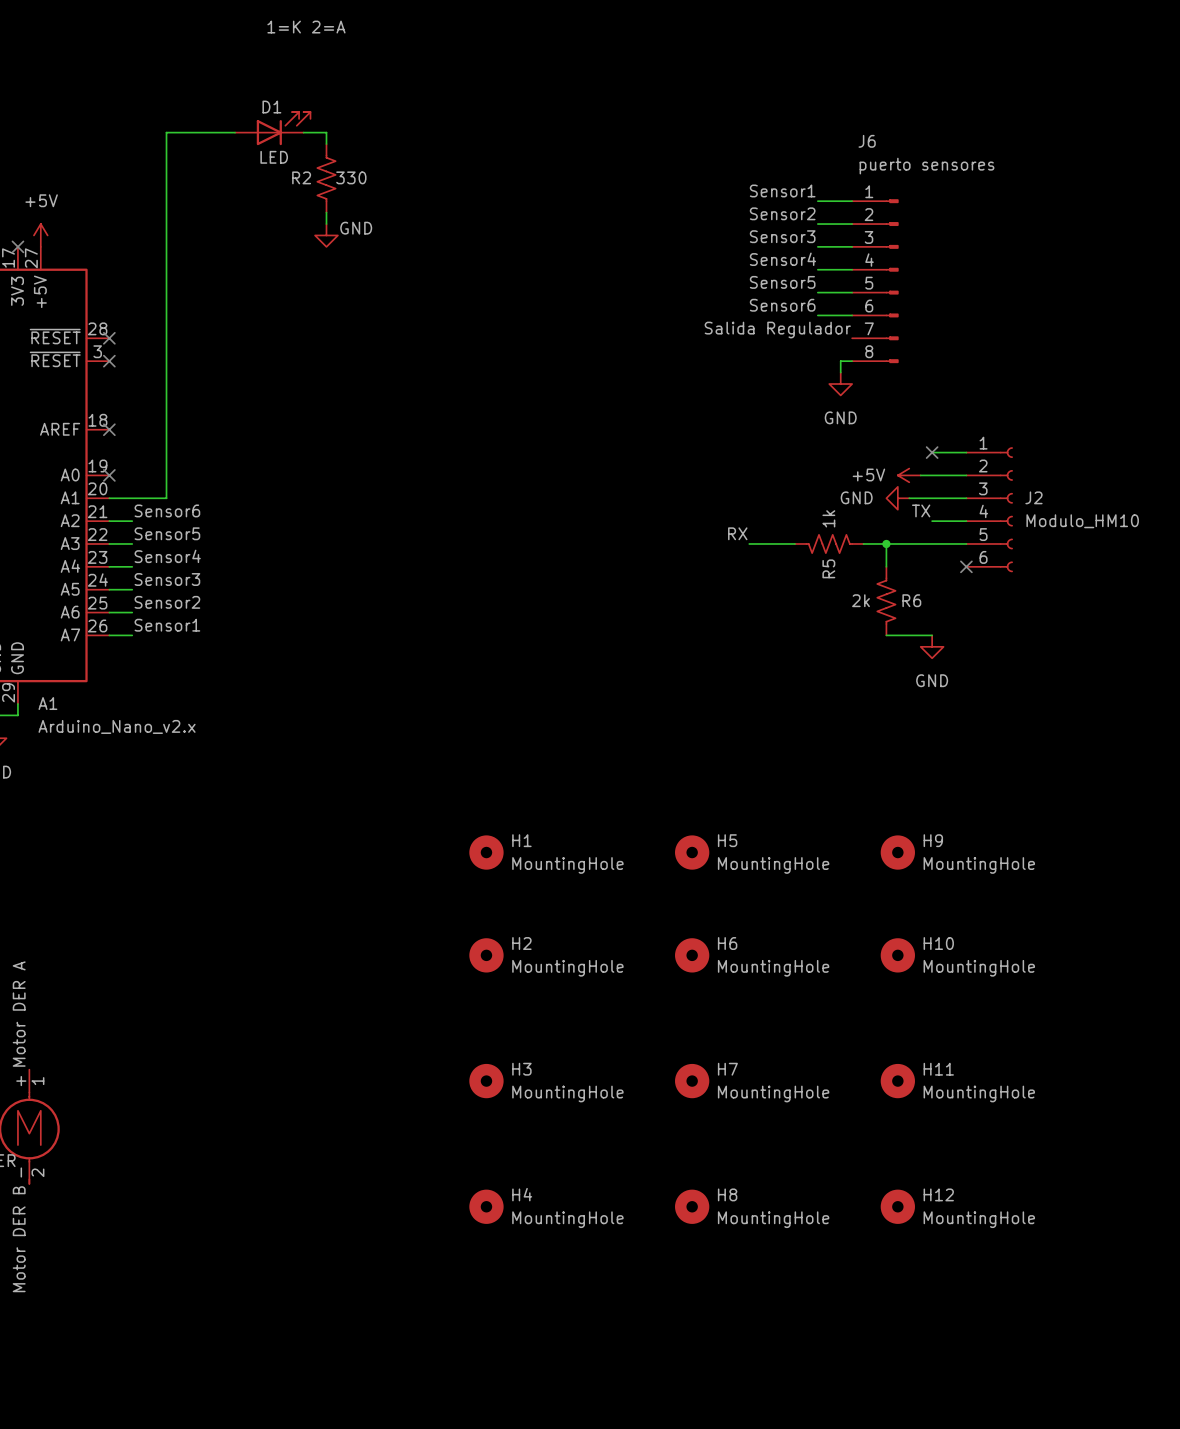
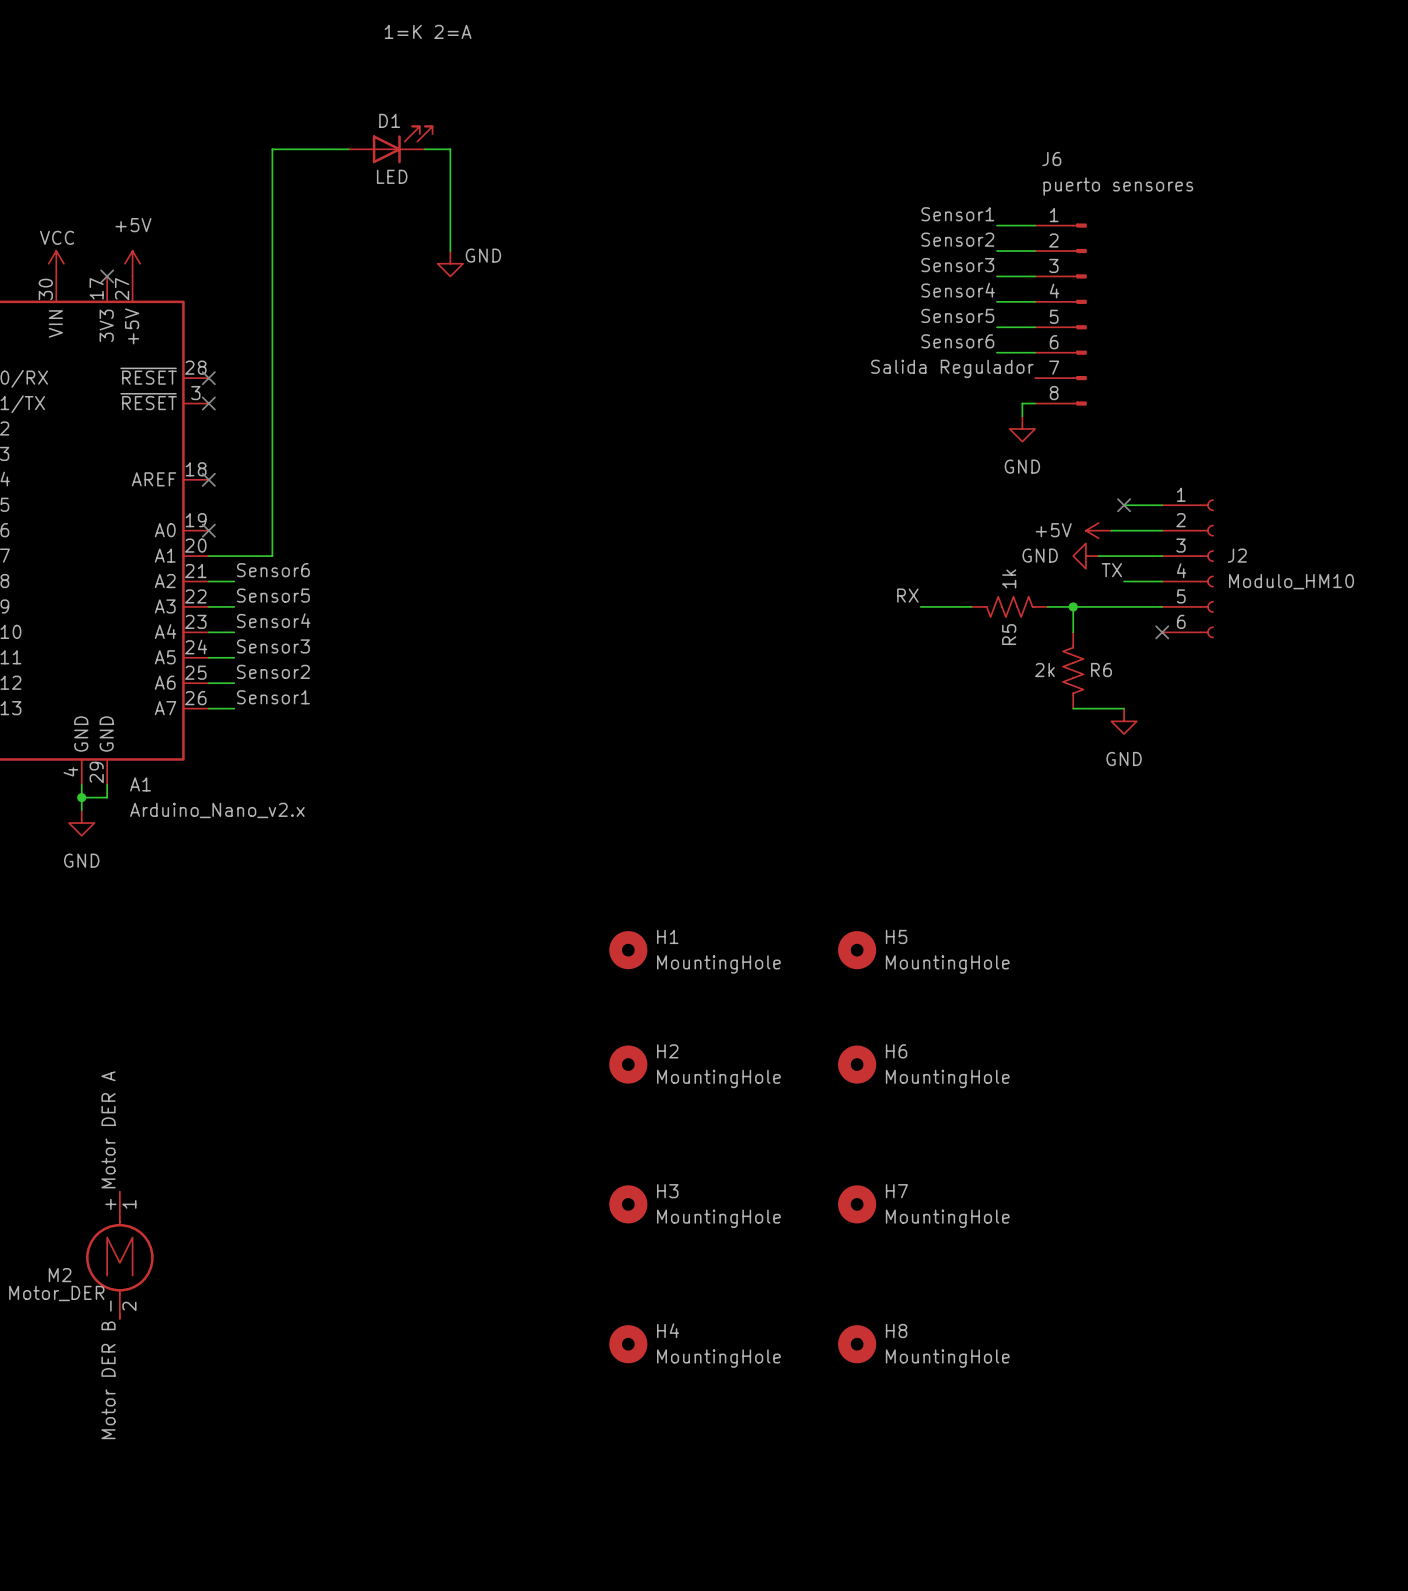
R2: 330 (326, 178) -> none
H9: MountingHole (897, 852) -> none
H10: MountingHole (897, 955) -> none
H11: MountingHole (897, 1081) -> none
H12: MountingHole (897, 1206) -> none

